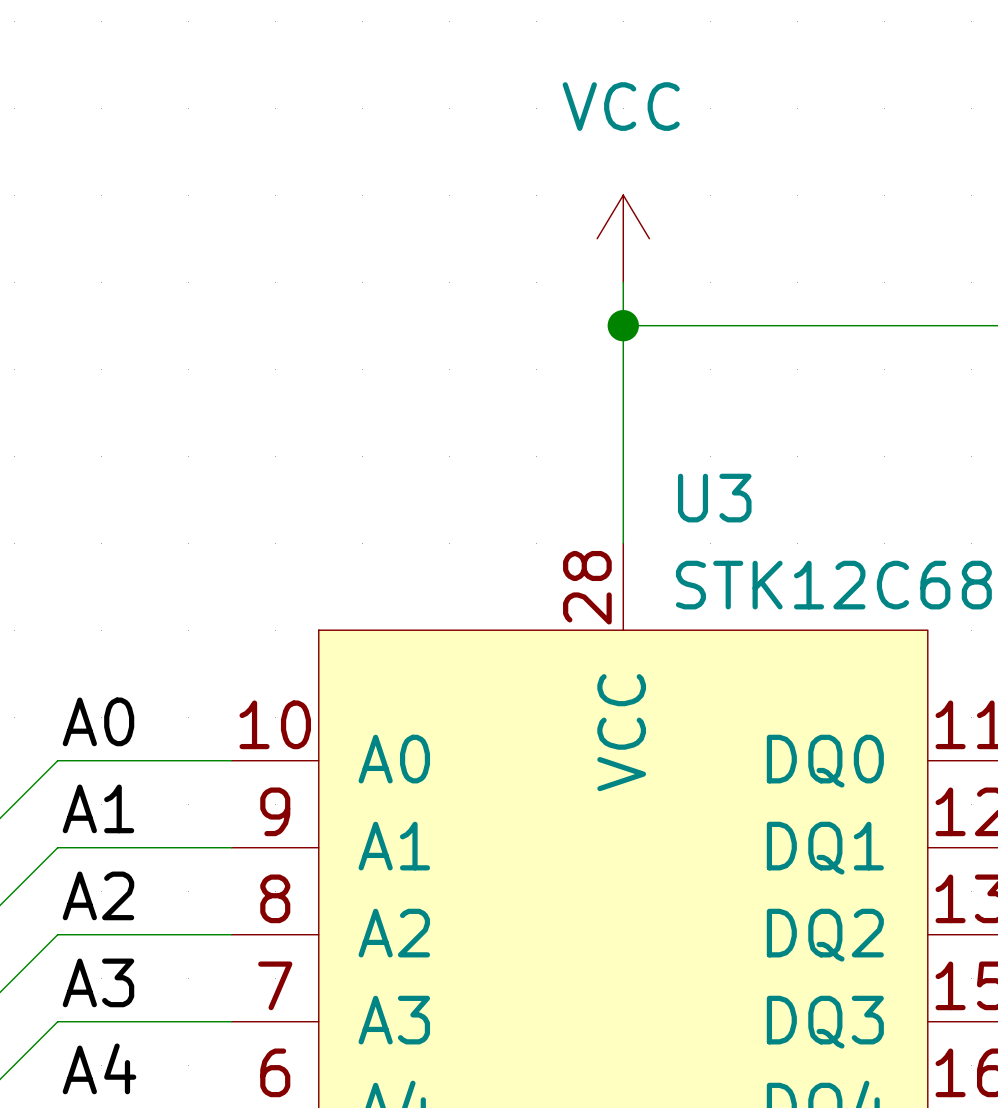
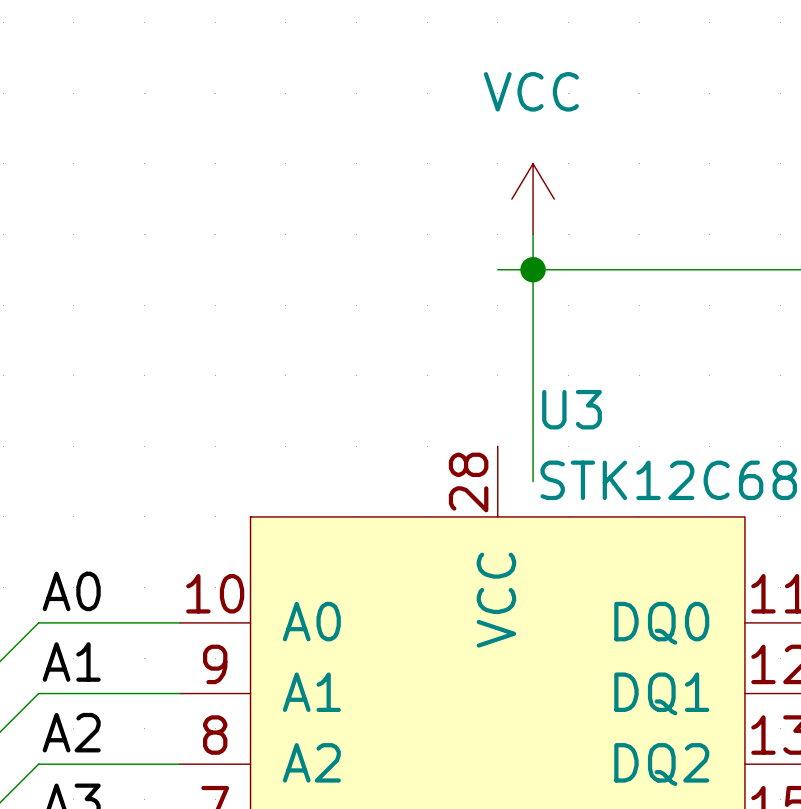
power symbol position: VCC (623, 238) -> VCC (533, 199)
wire: (623, 282) (623, 543) -> none
wire: none -> (533, 234) (533, 481)
junction position: (623, 325) -> (533, 269)

